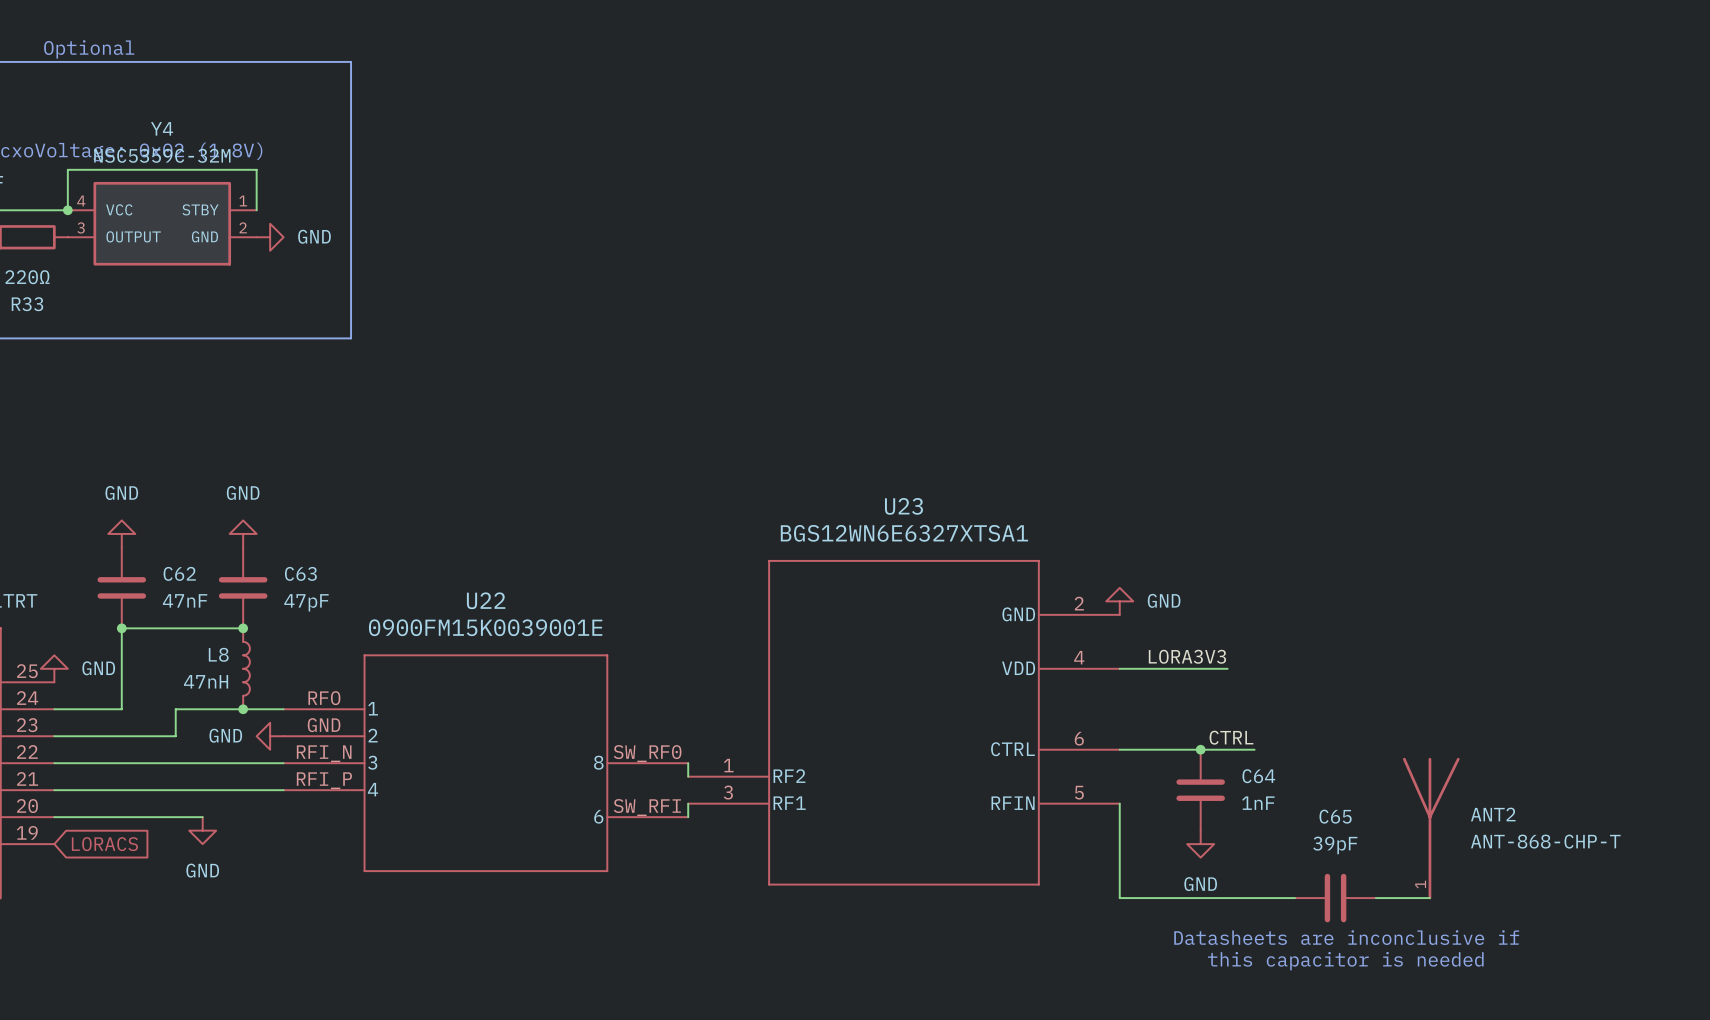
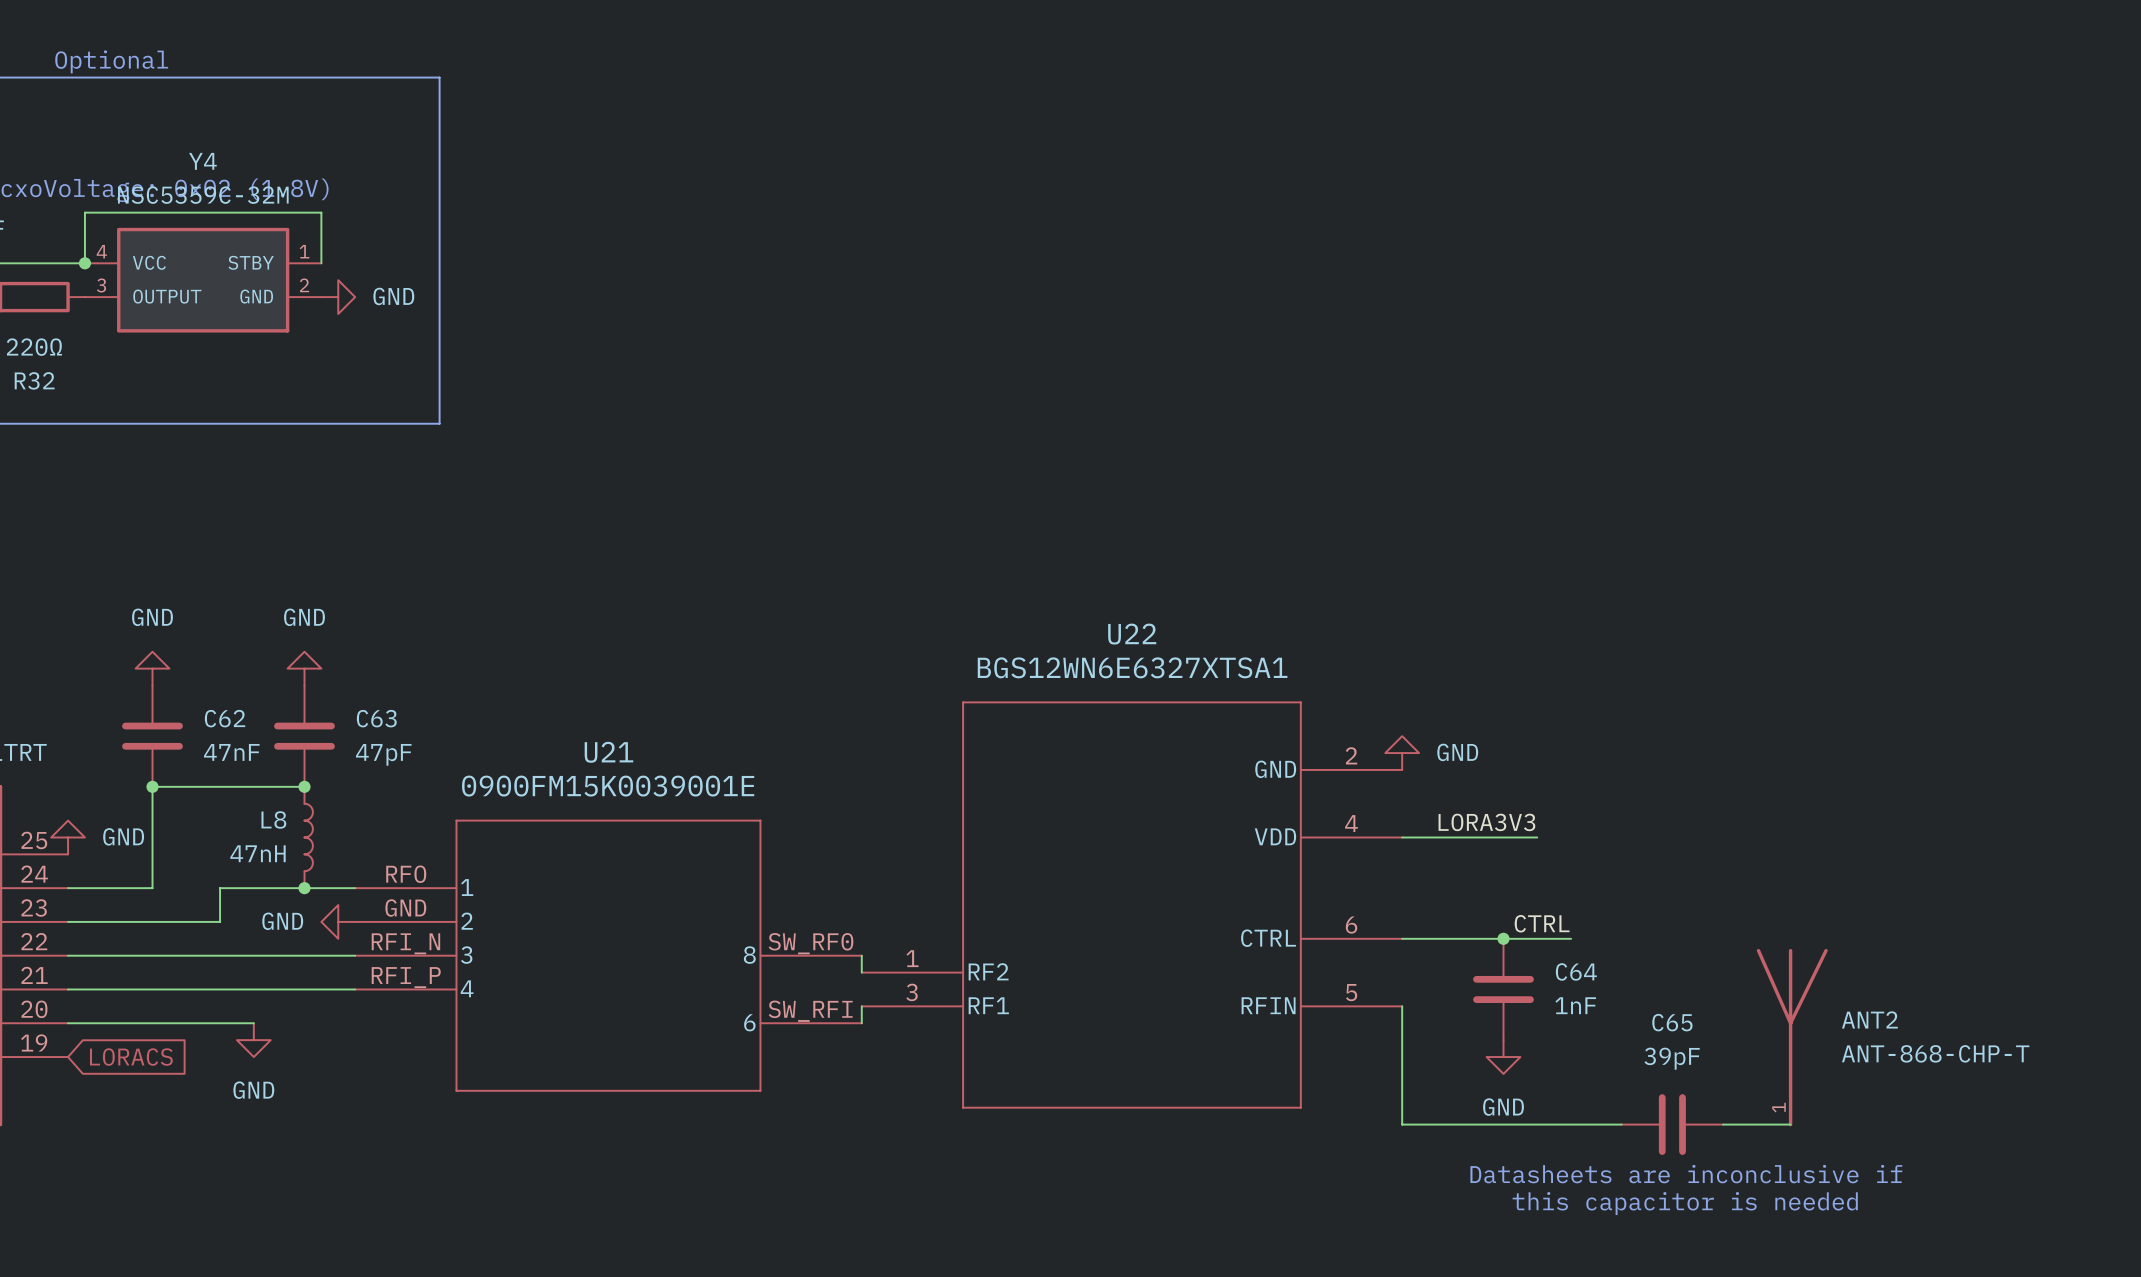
R33 name: R33 (27, 304) -> R32 (34, 380)
U23 name: U23 (903, 506) -> U22 (1132, 634)
U22 name: U22 (486, 600) -> U21 (608, 752)

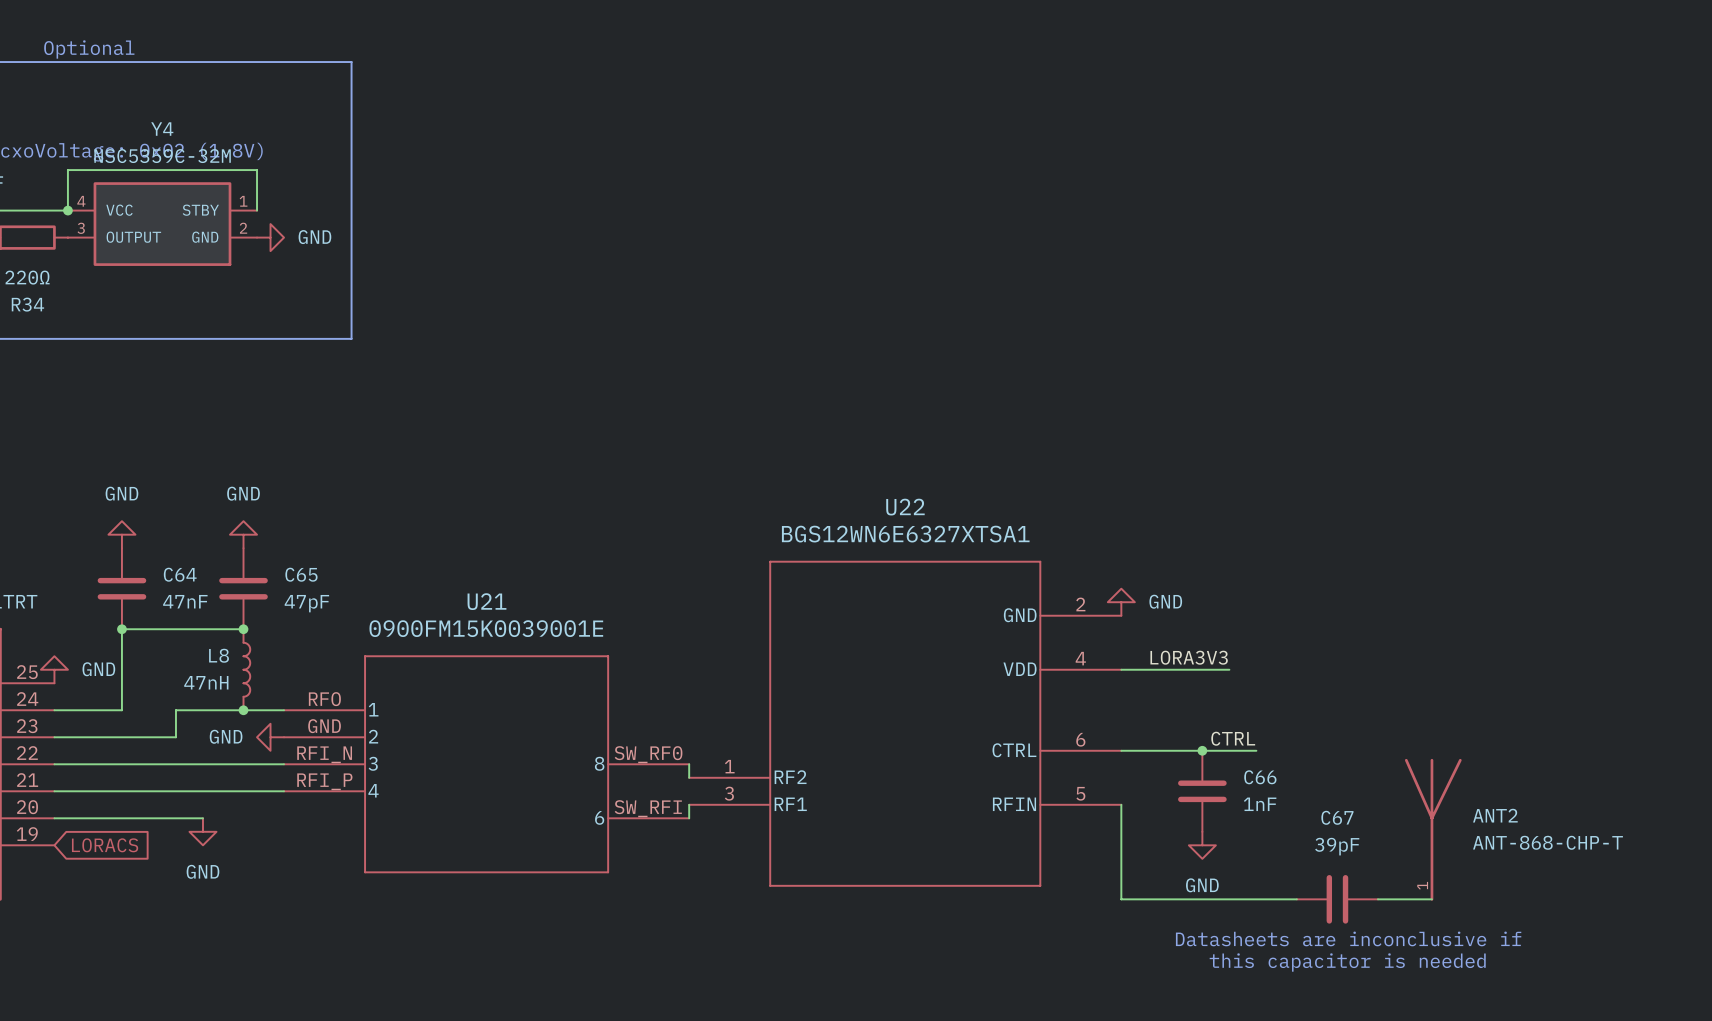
R32 name: R32 (34, 380) -> R34 (27, 304)
C62 name: C62 (225, 718) -> C64 (180, 574)
C63 name: C63 (376, 718) -> C65 (301, 574)
C64 name: C64 (1576, 971) -> C66 (1260, 777)
C65 name: C65 (1672, 1022) -> C67 (1337, 817)

